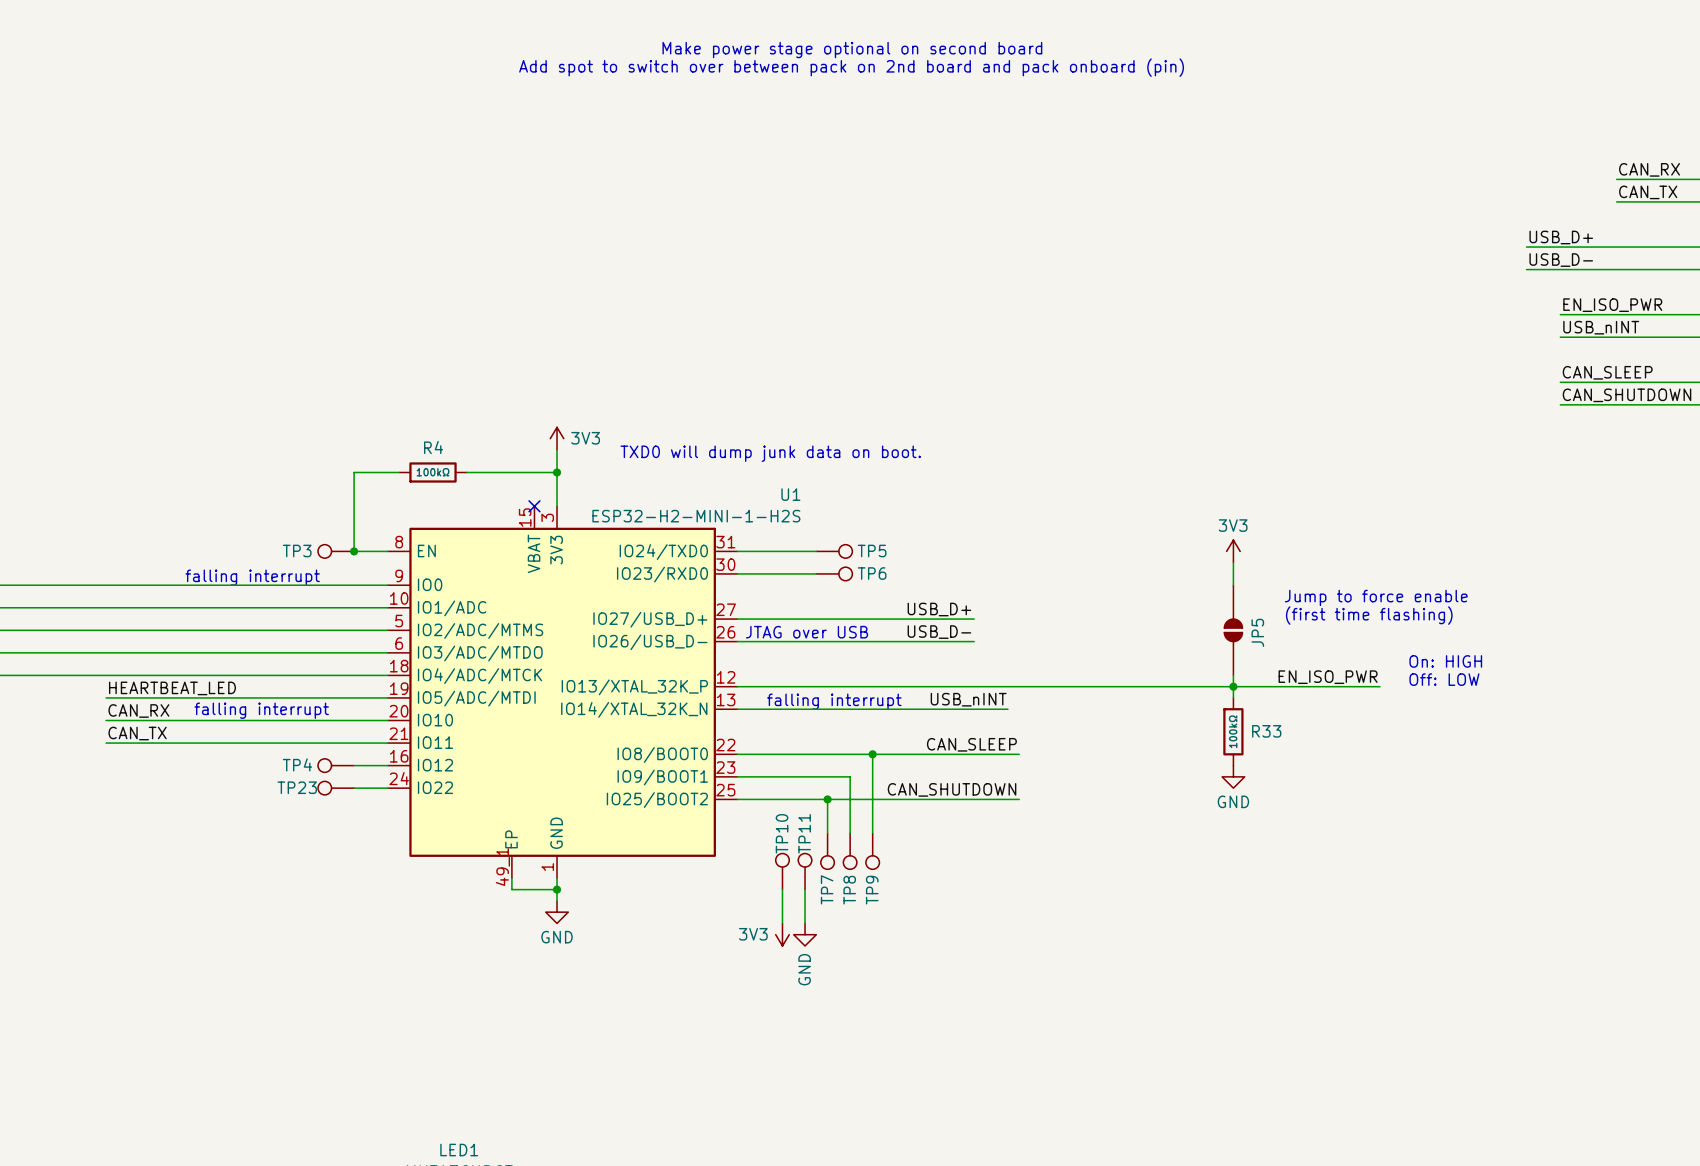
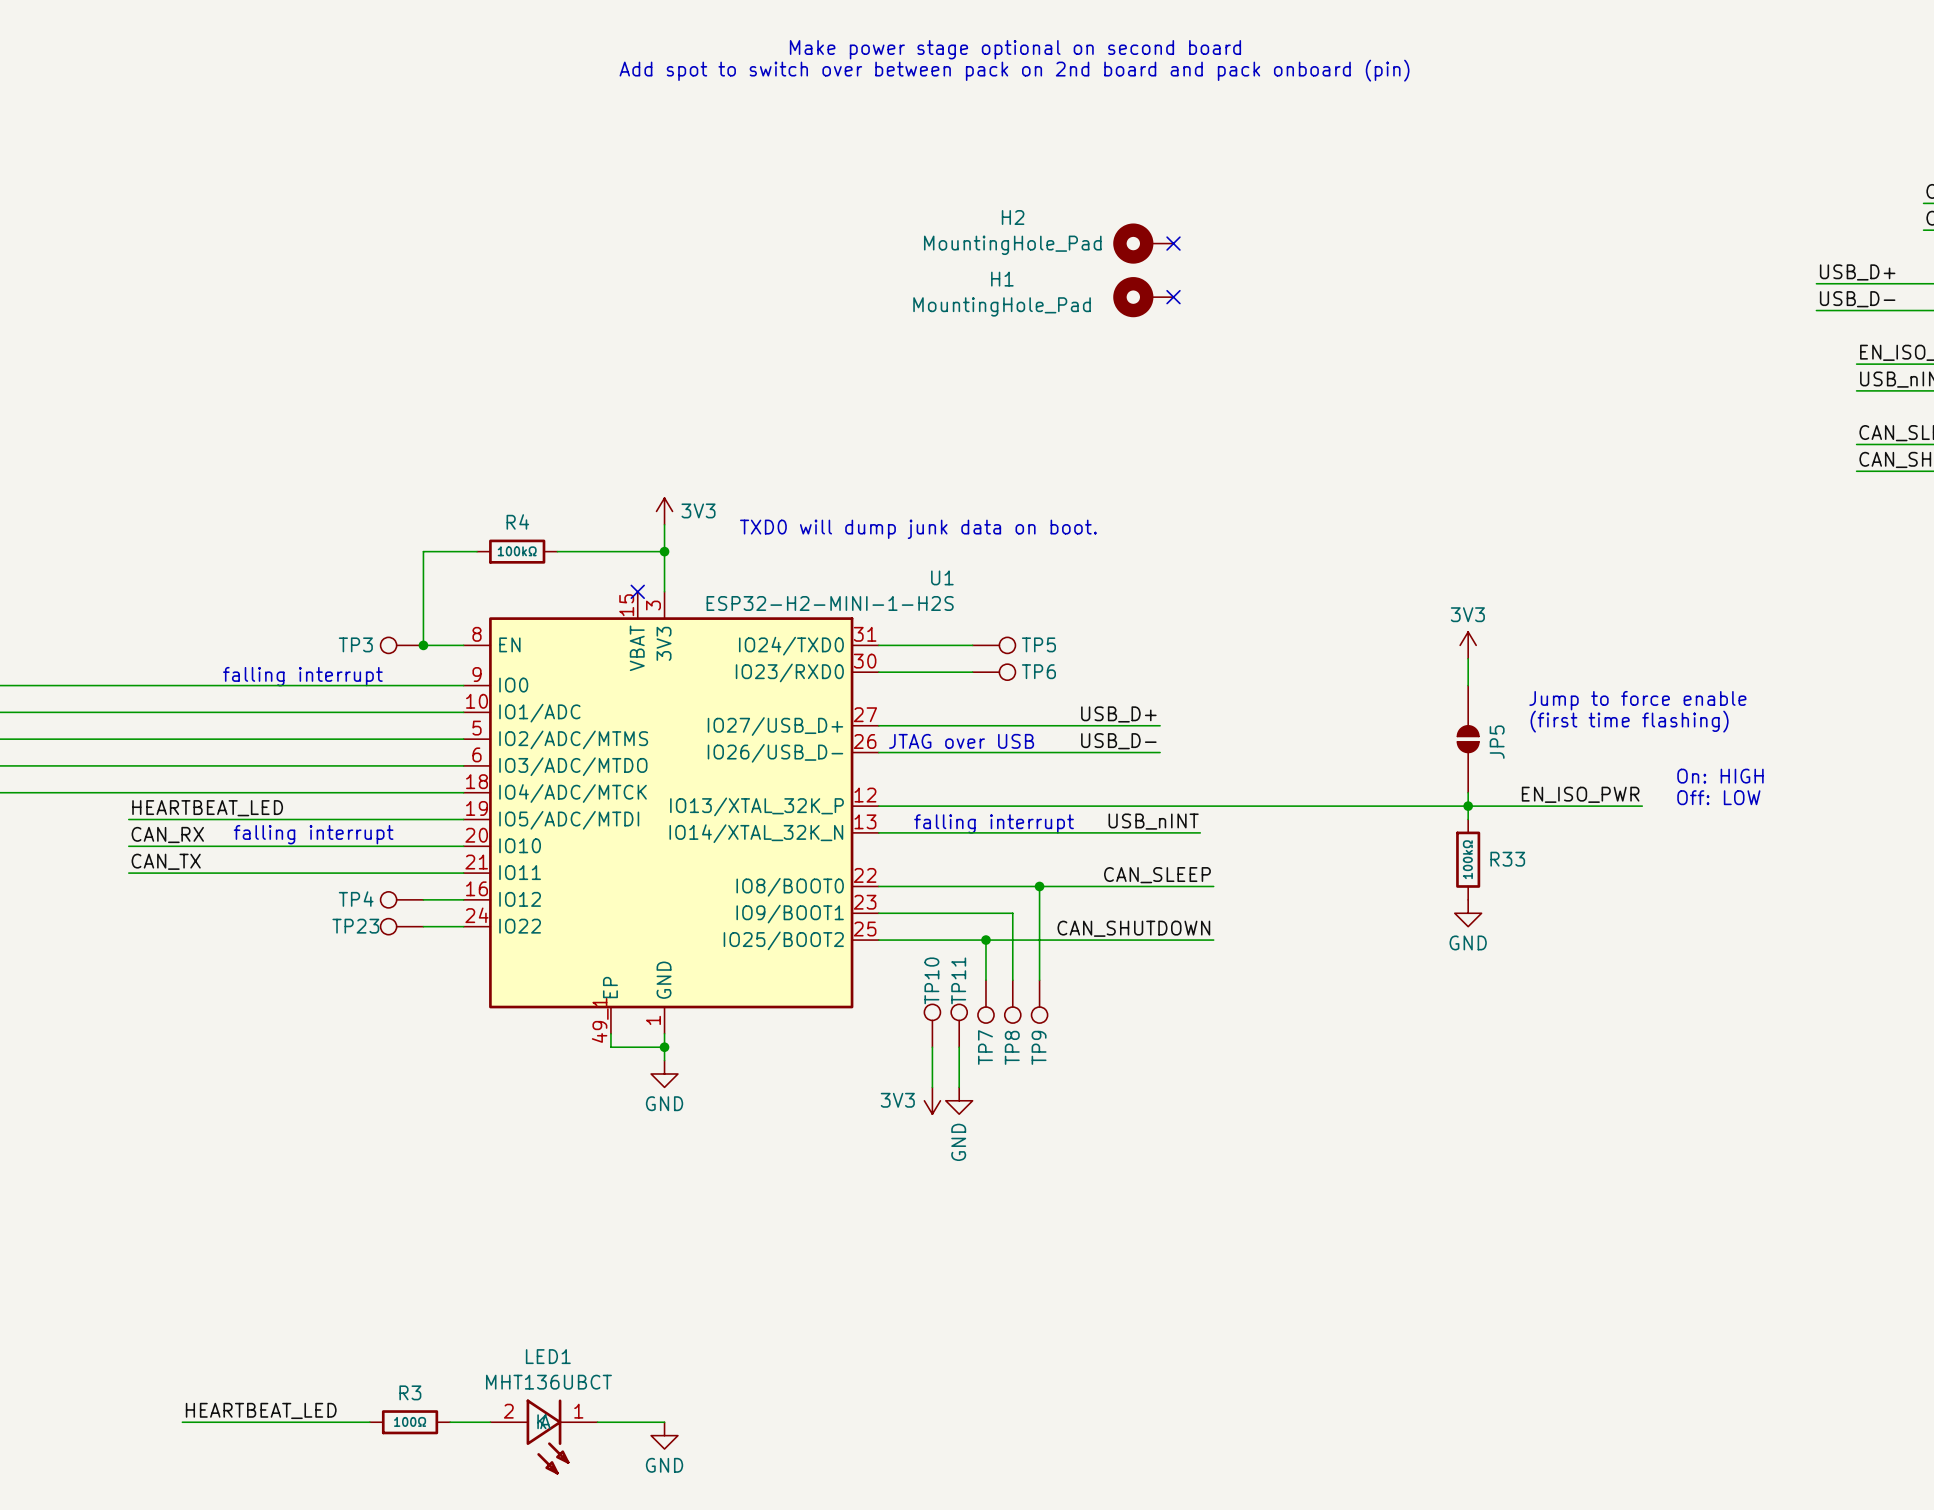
H2: none -> MountingHole_Pad (1143, 243)
no-connect mark: none -> (1173, 243)
H1: none -> MountingHole_Pad (1143, 297)
no-connect mark: none -> (1173, 297)

